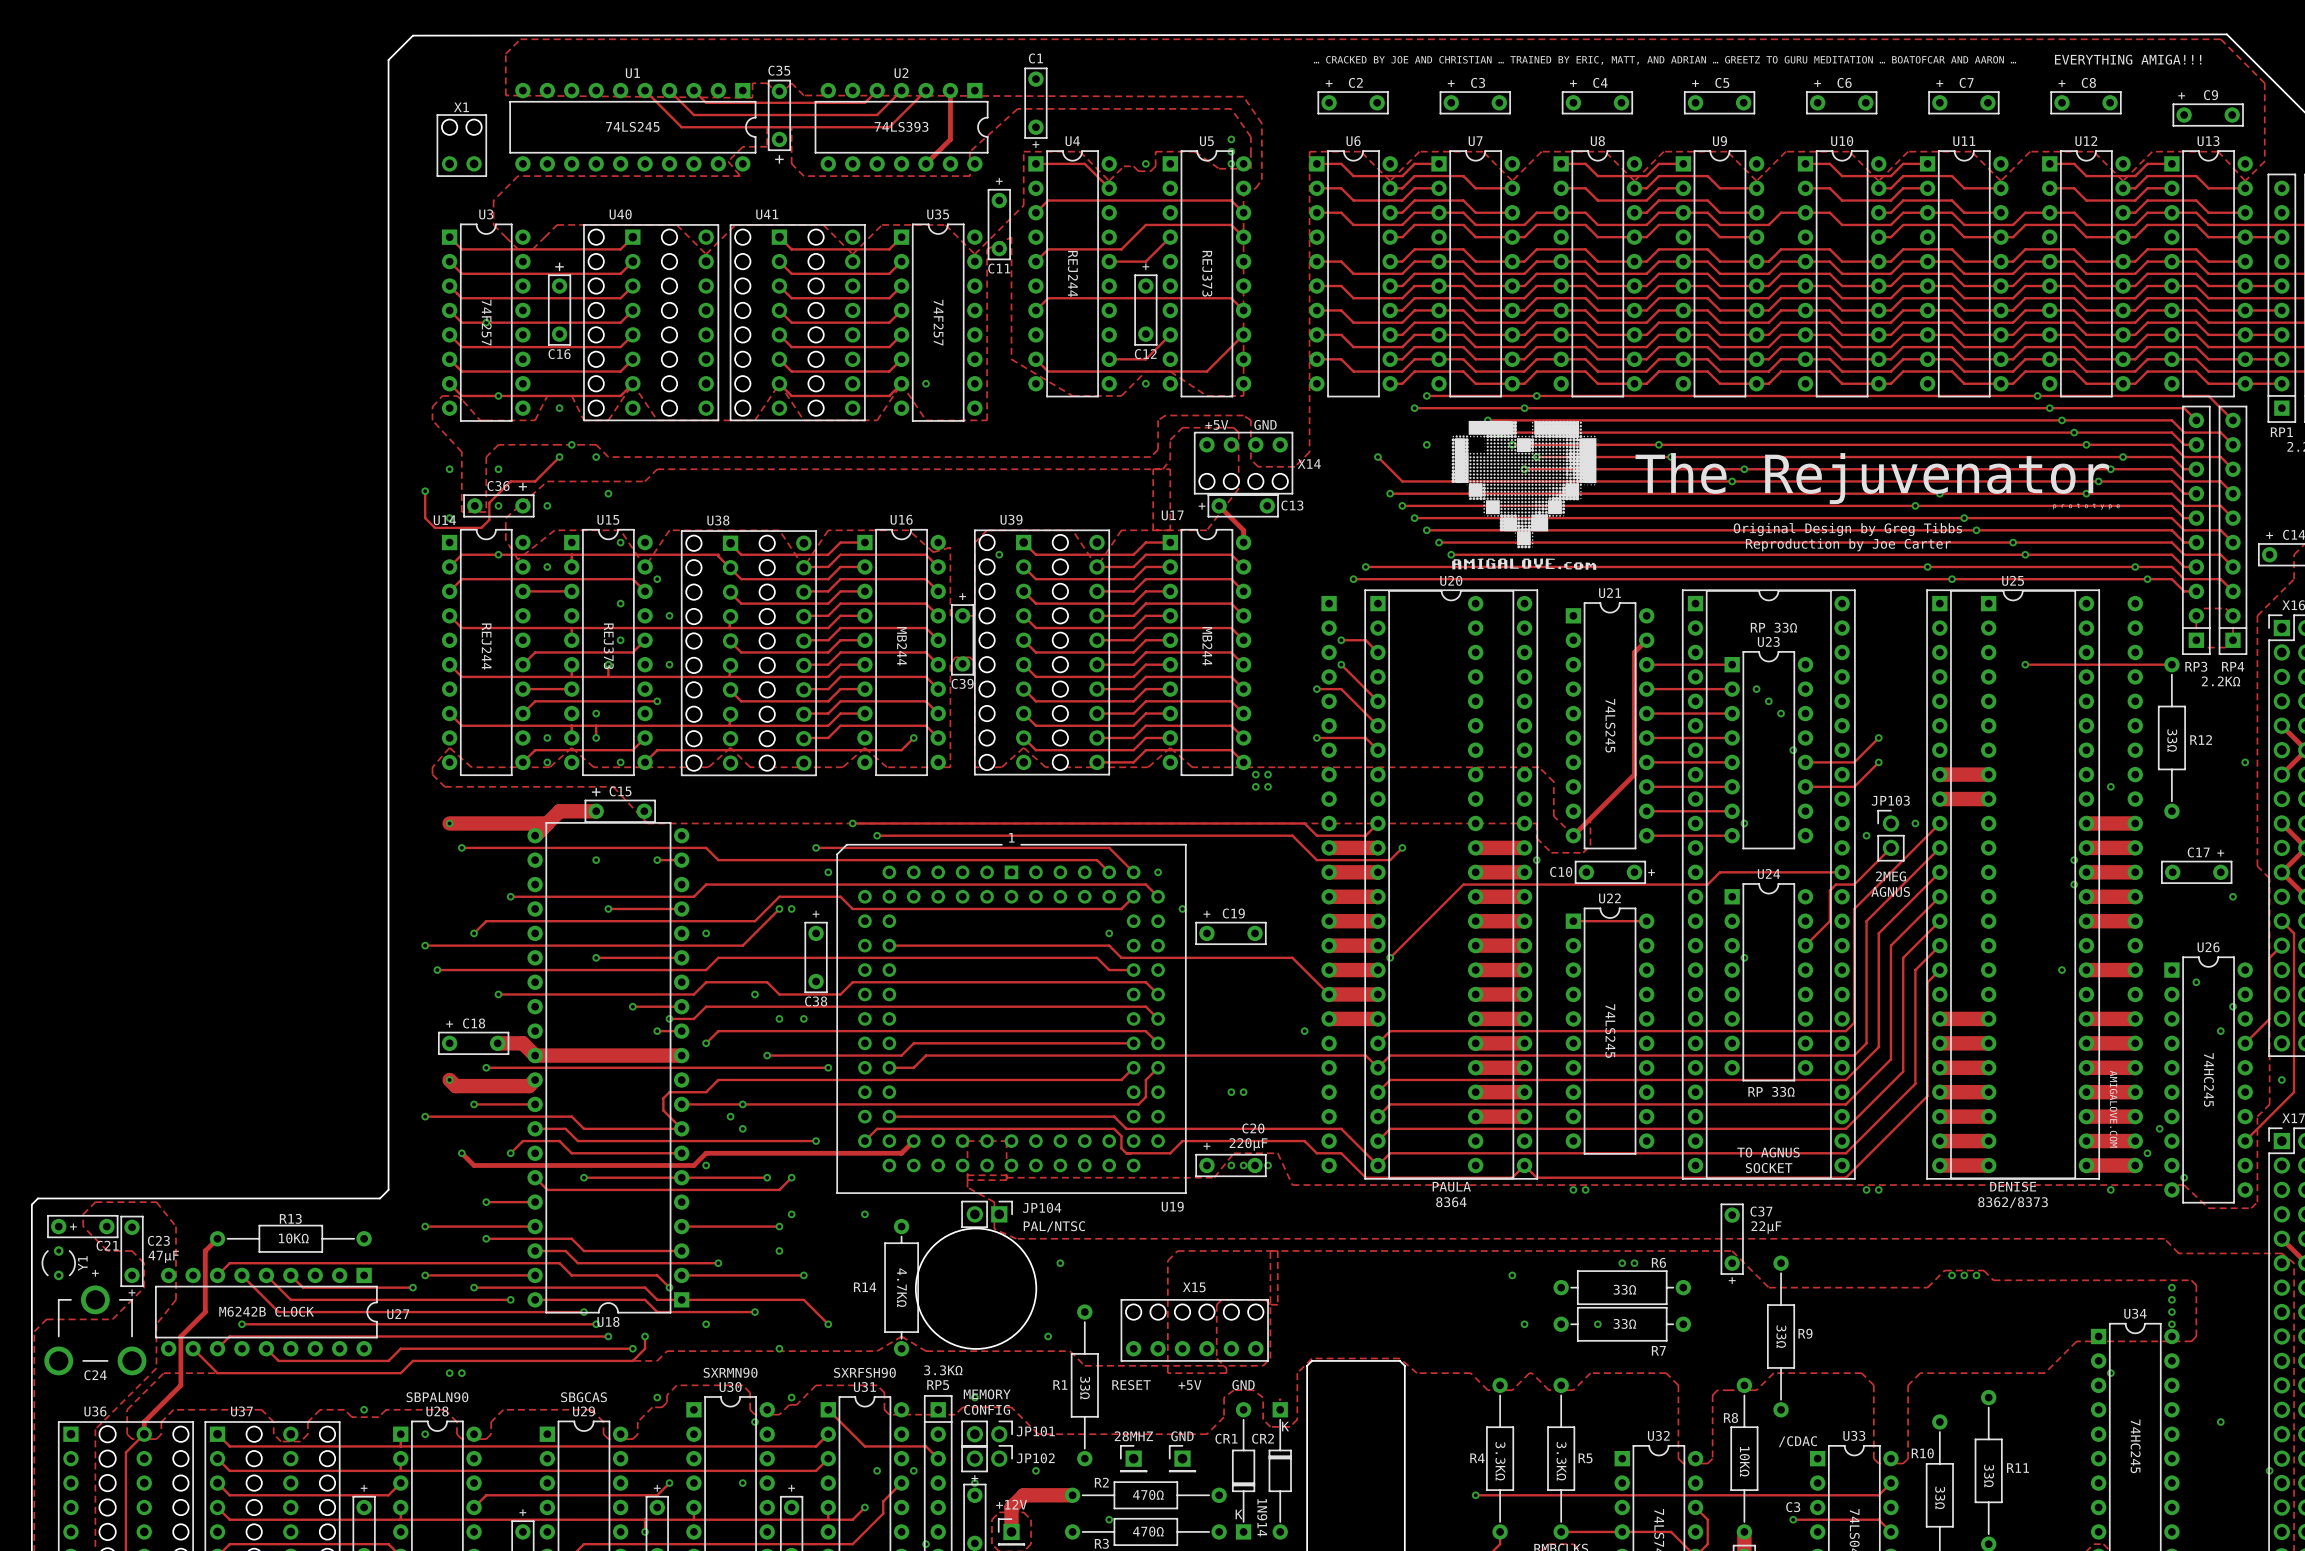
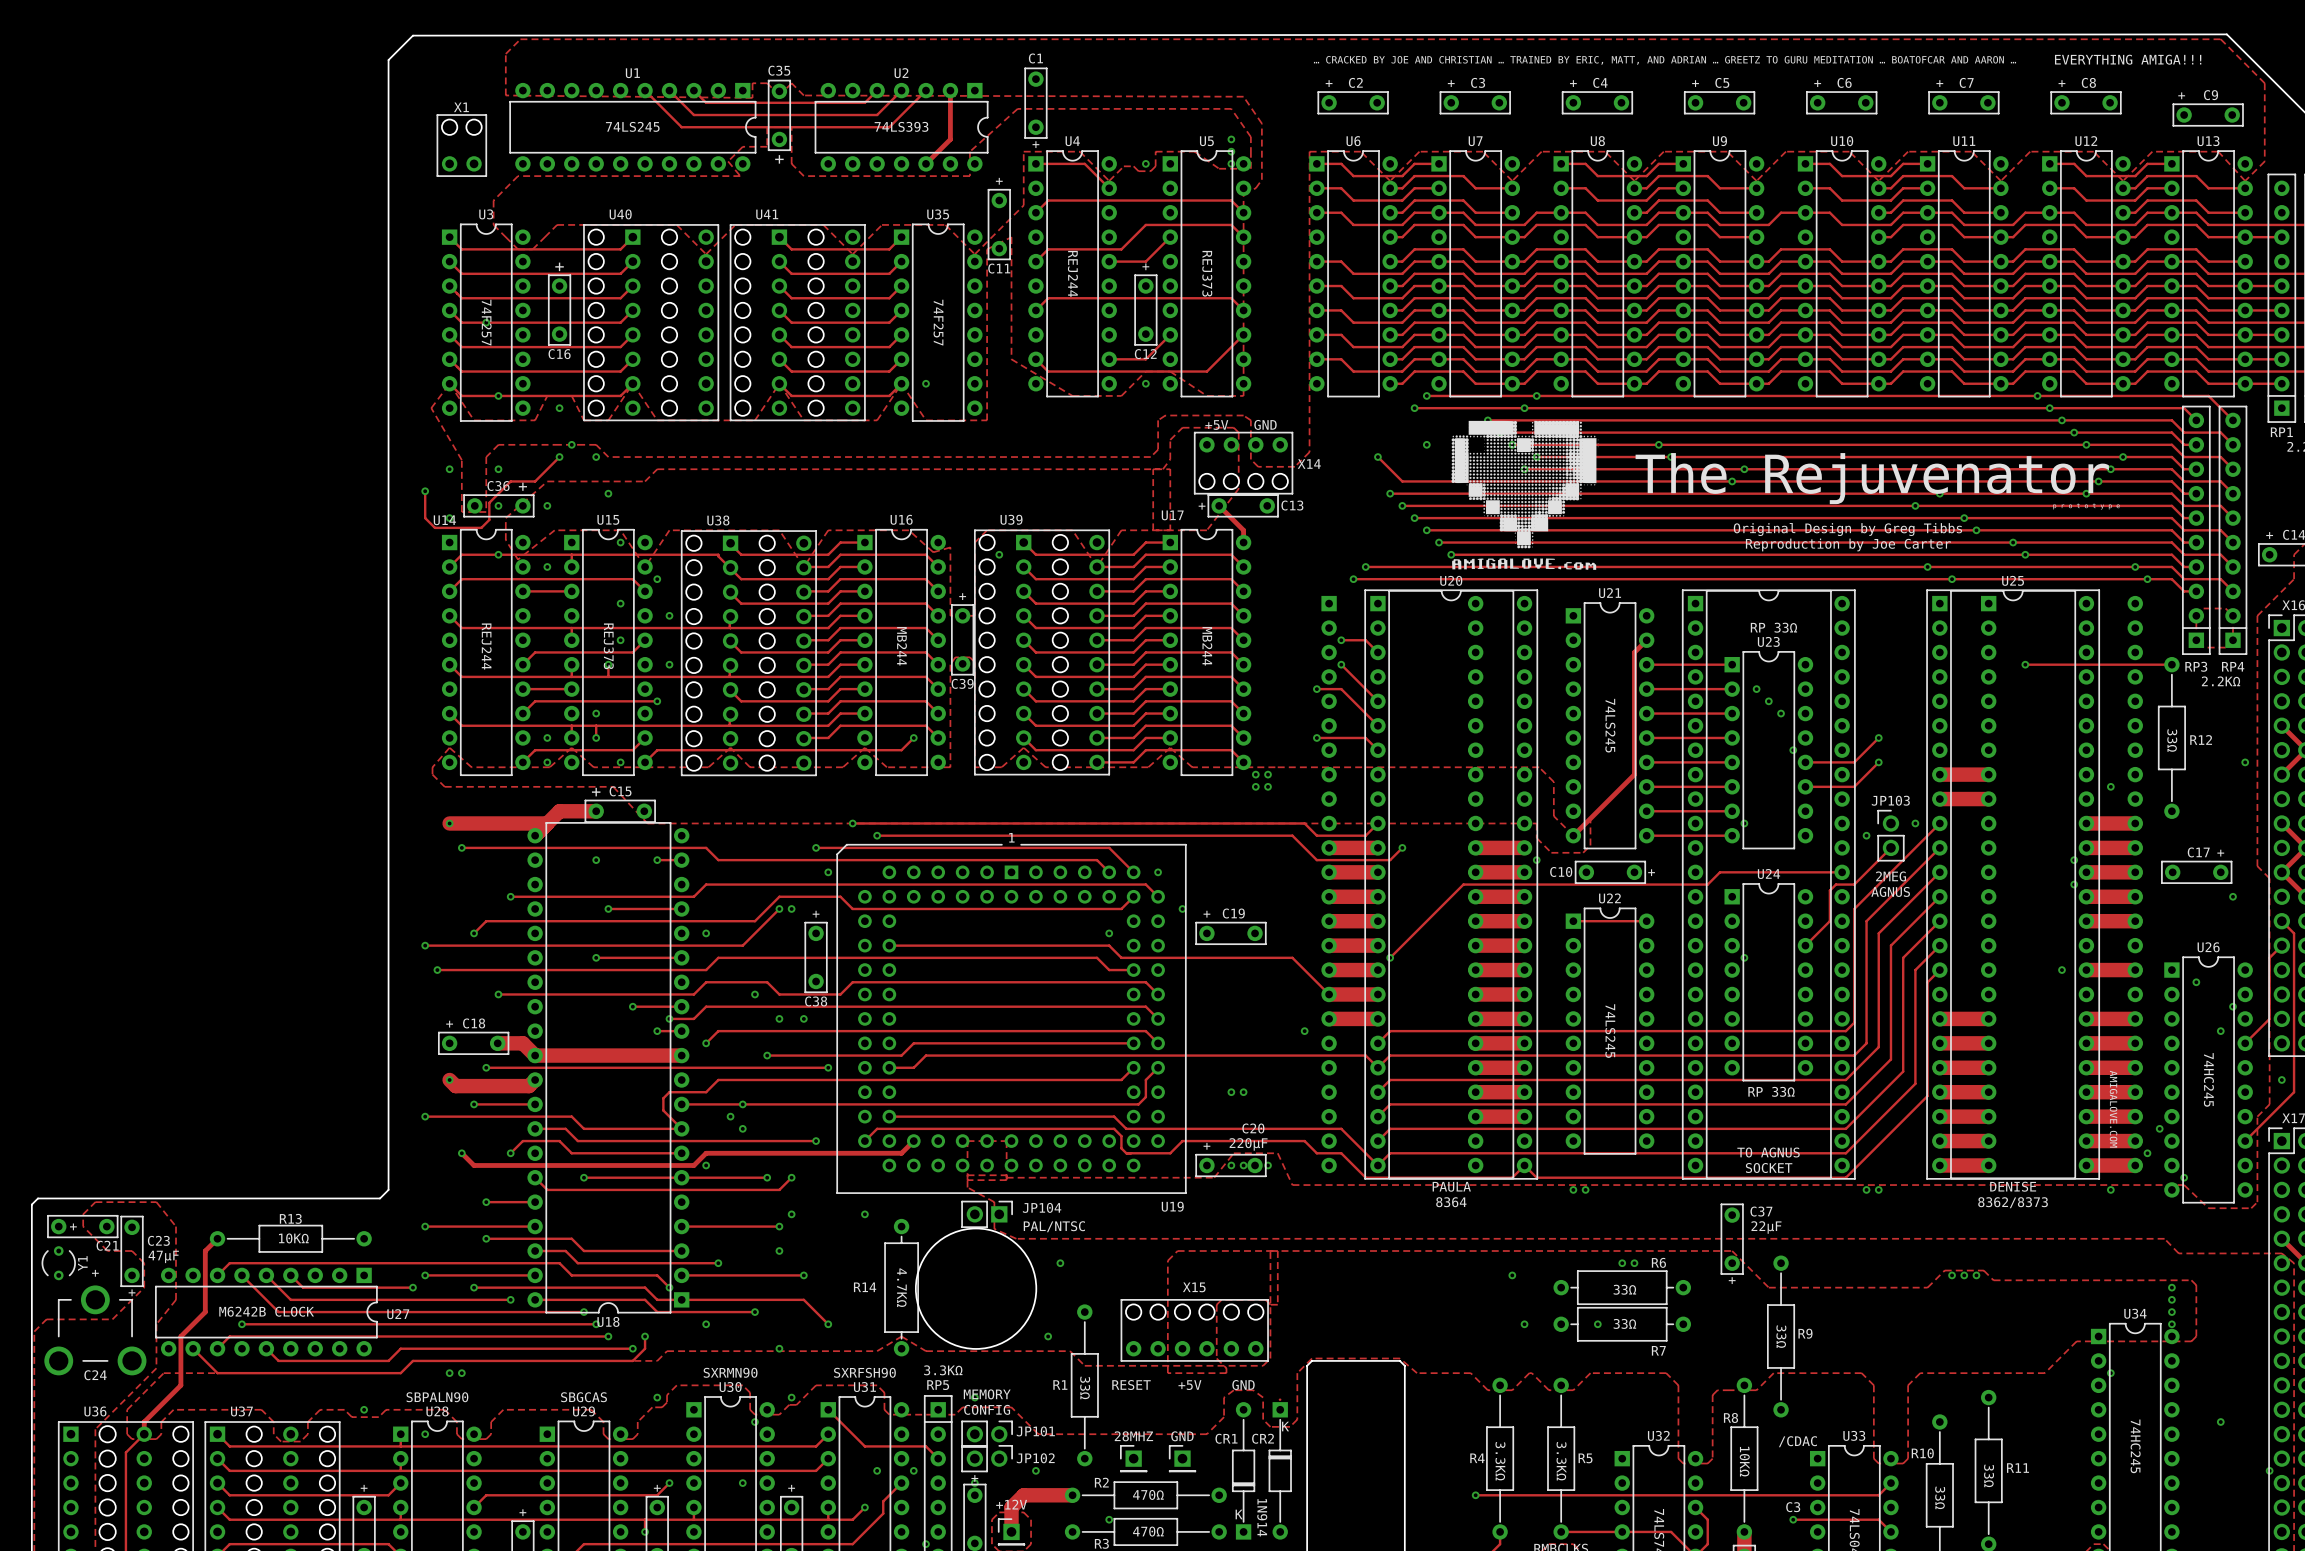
zone outline: (480, 420) (456, 395) (442, 395) (432, 406) (432, 420) (461, 452) (461, 460) -> (480, 420) (474, 420) (449, 383) (431, 408) (461, 460)

